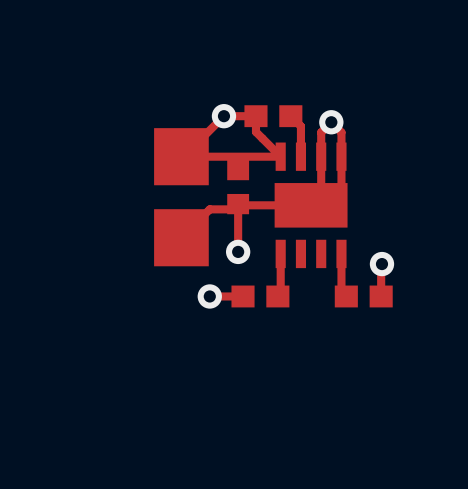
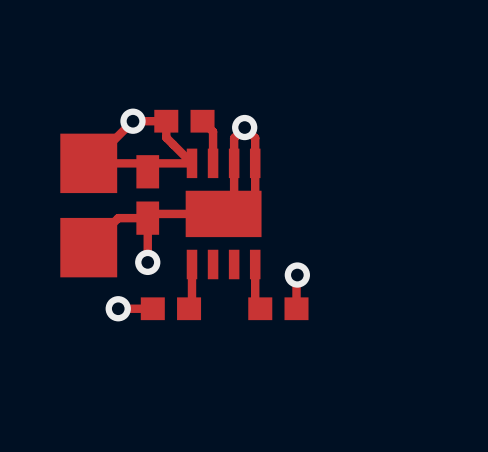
part footprint: [227, 159, 250, 215] -> [136, 155, 160, 235]

